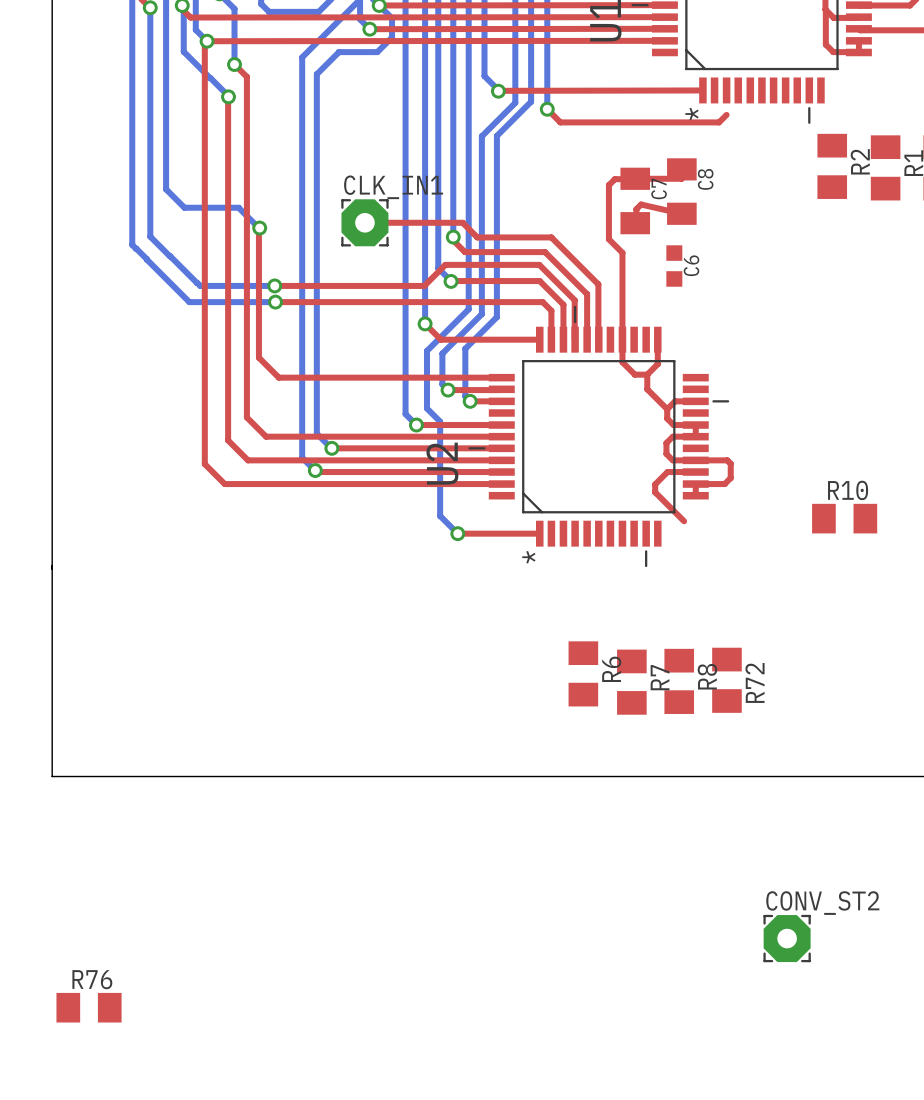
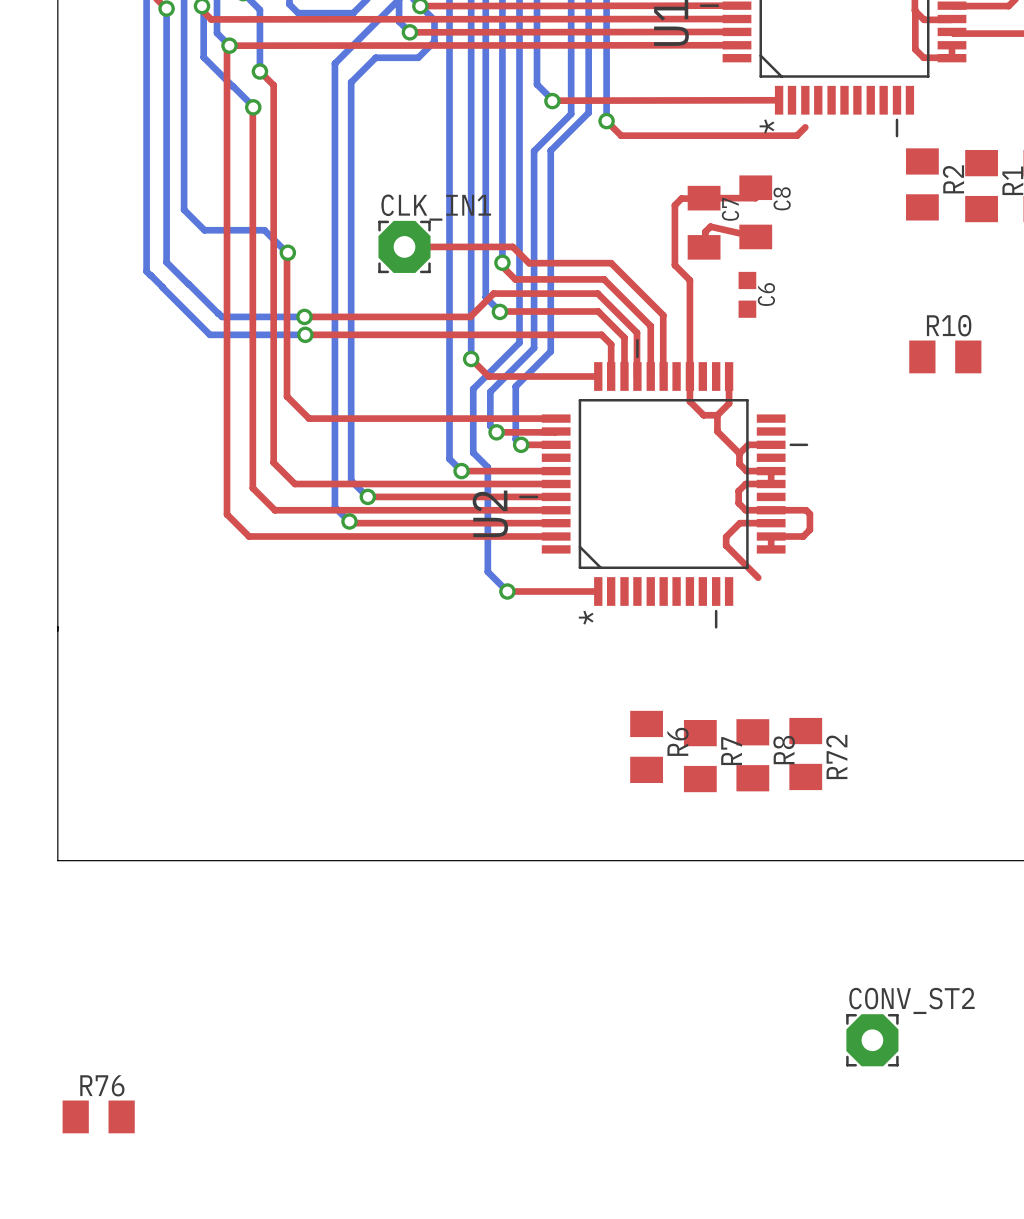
R10 position: (844, 518) -> (945, 356)

